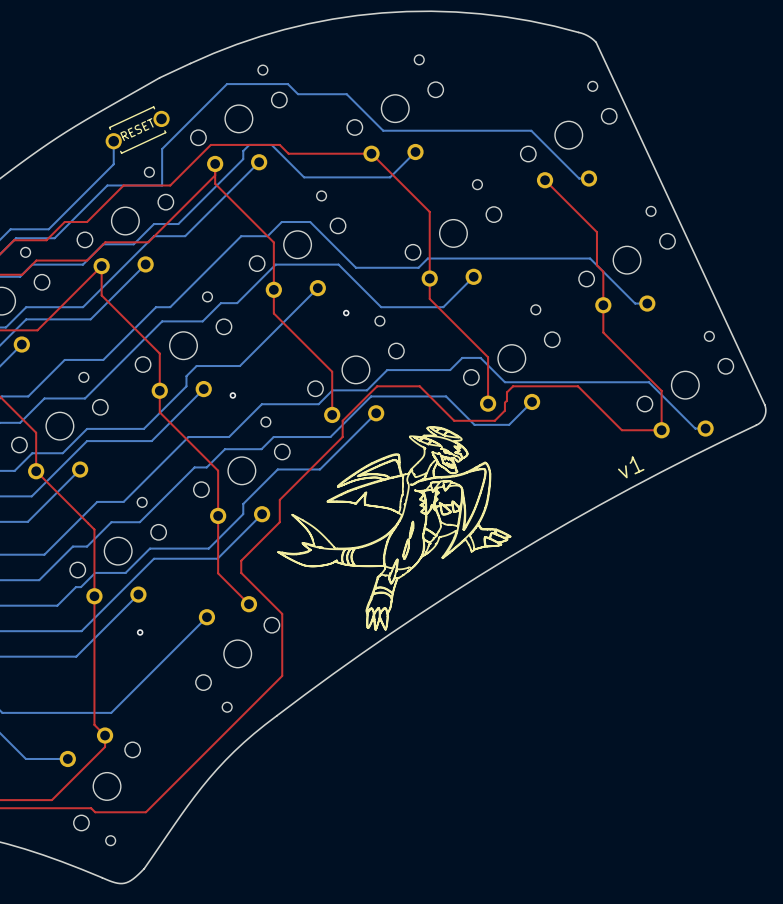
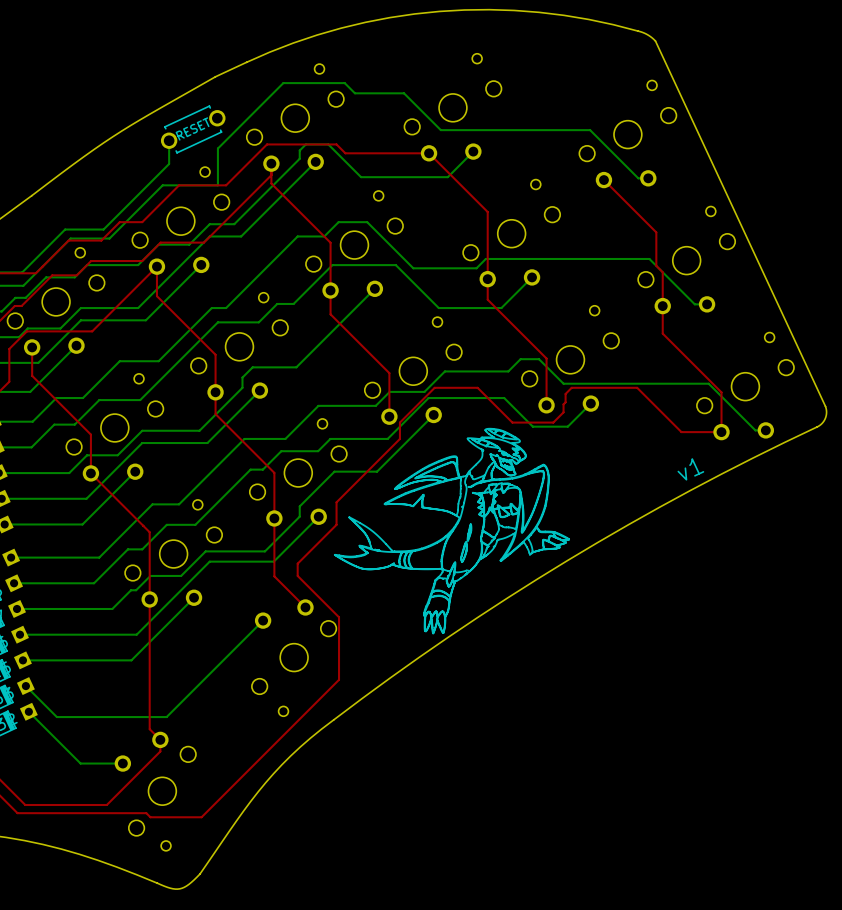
via: (346, 313) -> none
via: (232, 395) -> none
via: (140, 632) -> none

